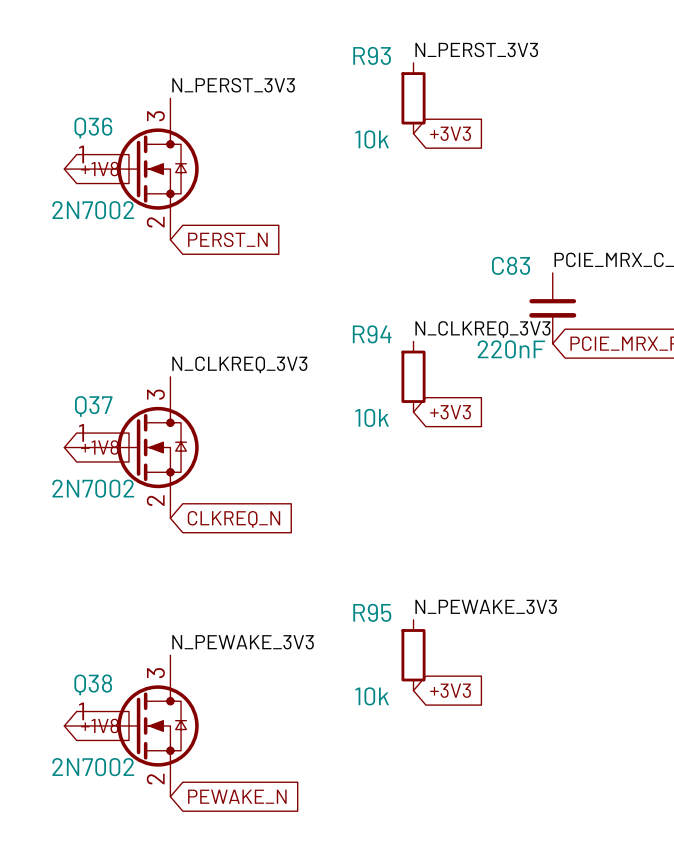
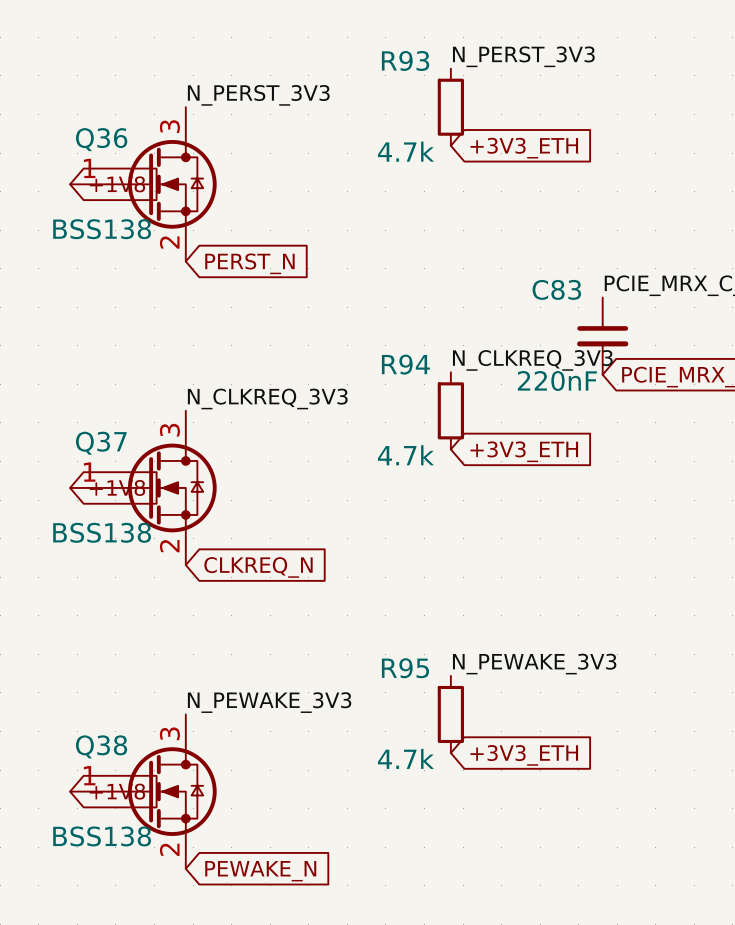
global label: +3V3 (450, 133) -> +3V3_ETH (524, 148)
R93 value: 10k (372, 139) -> 4.7k (405, 151)
Q36 value: 2N7002 (93, 210) -> BSS138 (102, 229)
global label: +3V3 (450, 412) -> +3V3_ETH (524, 451)
R94 value: 10k (372, 417) -> 4.7k (405, 455)
Q37 value: 2N7002 (93, 488) -> BSS138 (102, 532)
global label: +3V3 (450, 690) -> +3V3_ETH (524, 755)
R95 value: 10k (372, 696) -> 4.7k (405, 758)
Q38 value: 2N7002 (93, 767) -> BSS138 (102, 836)

